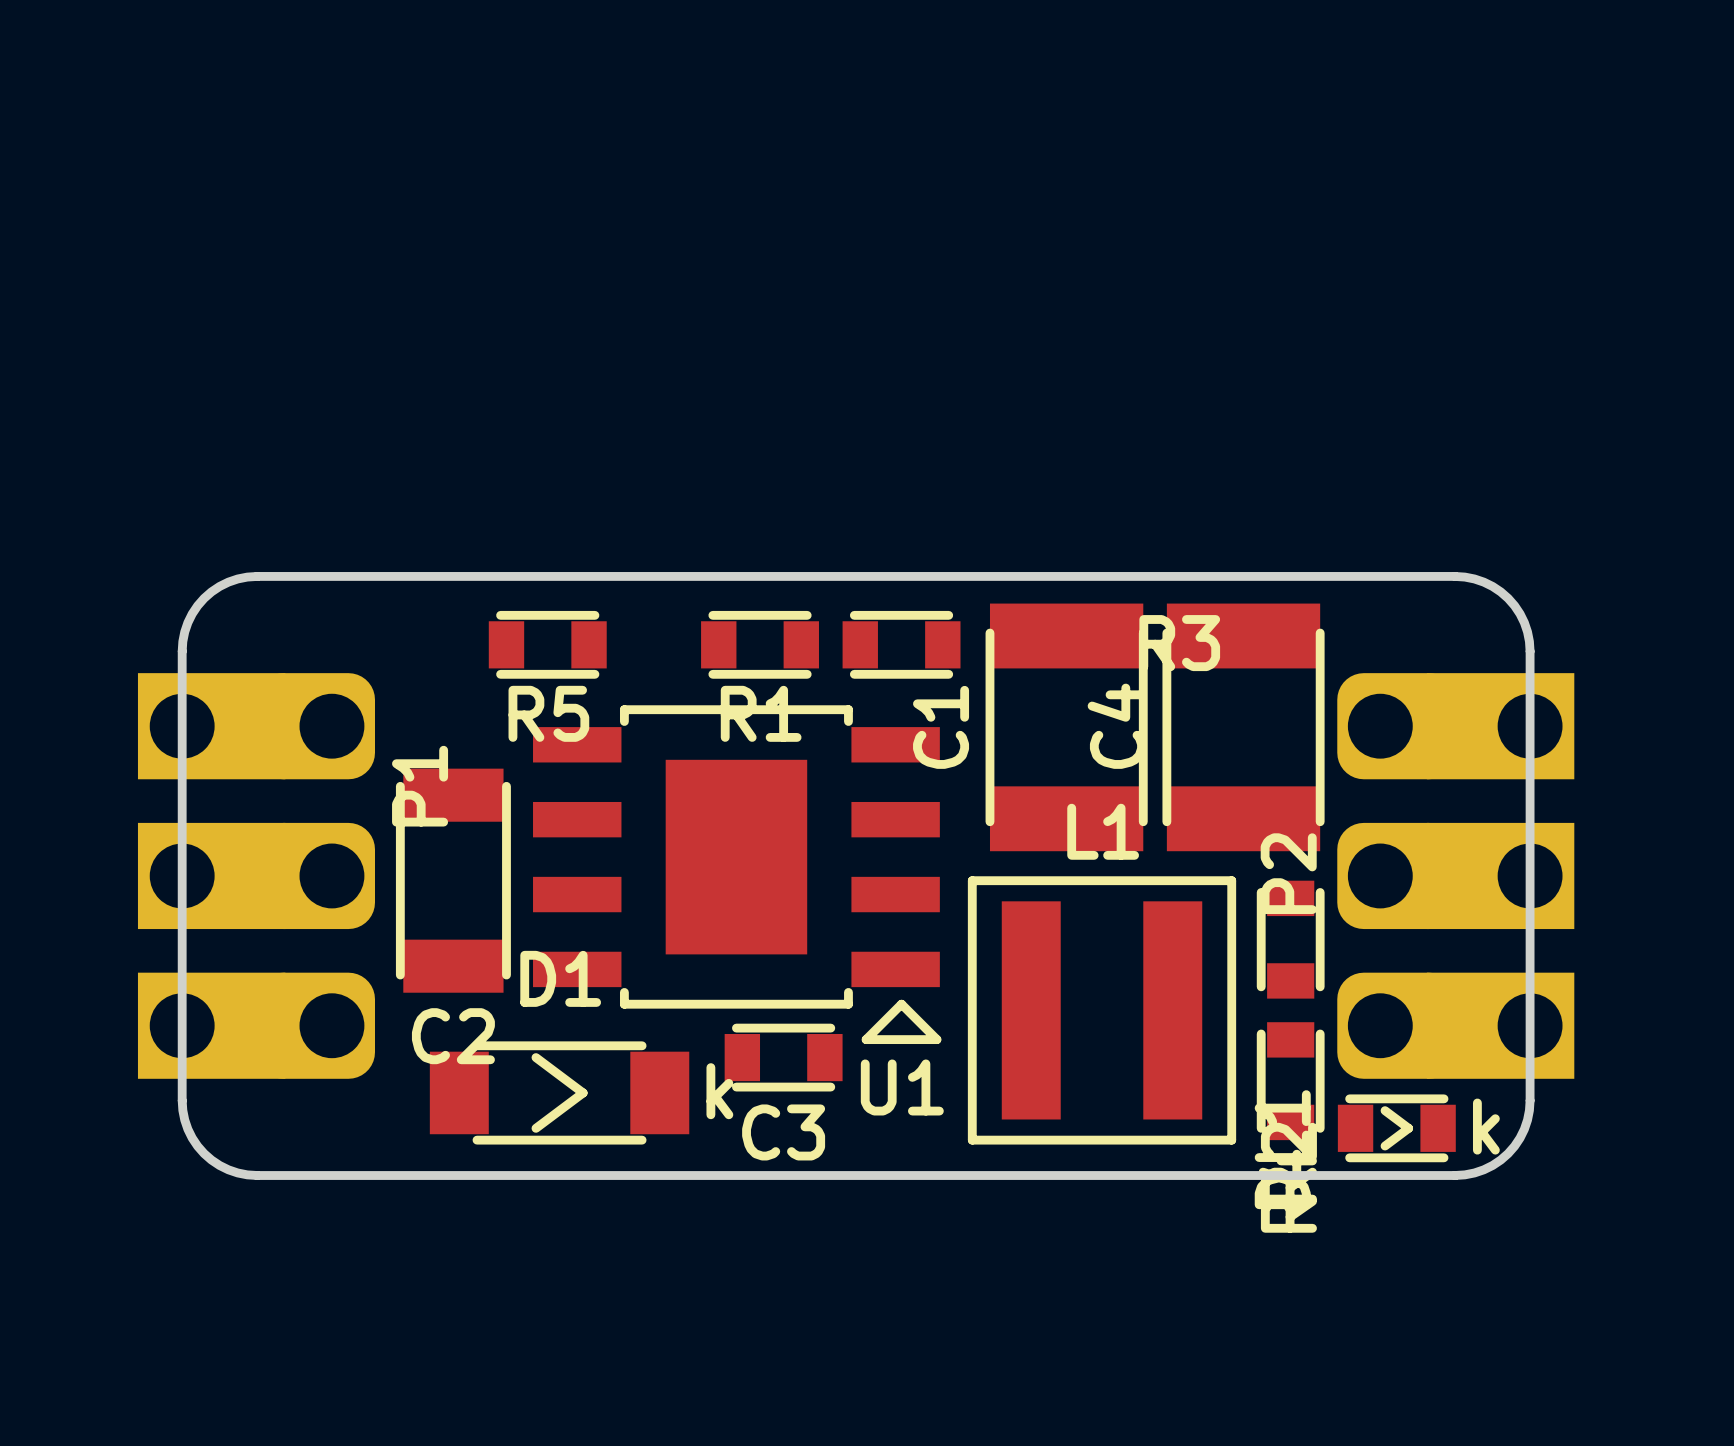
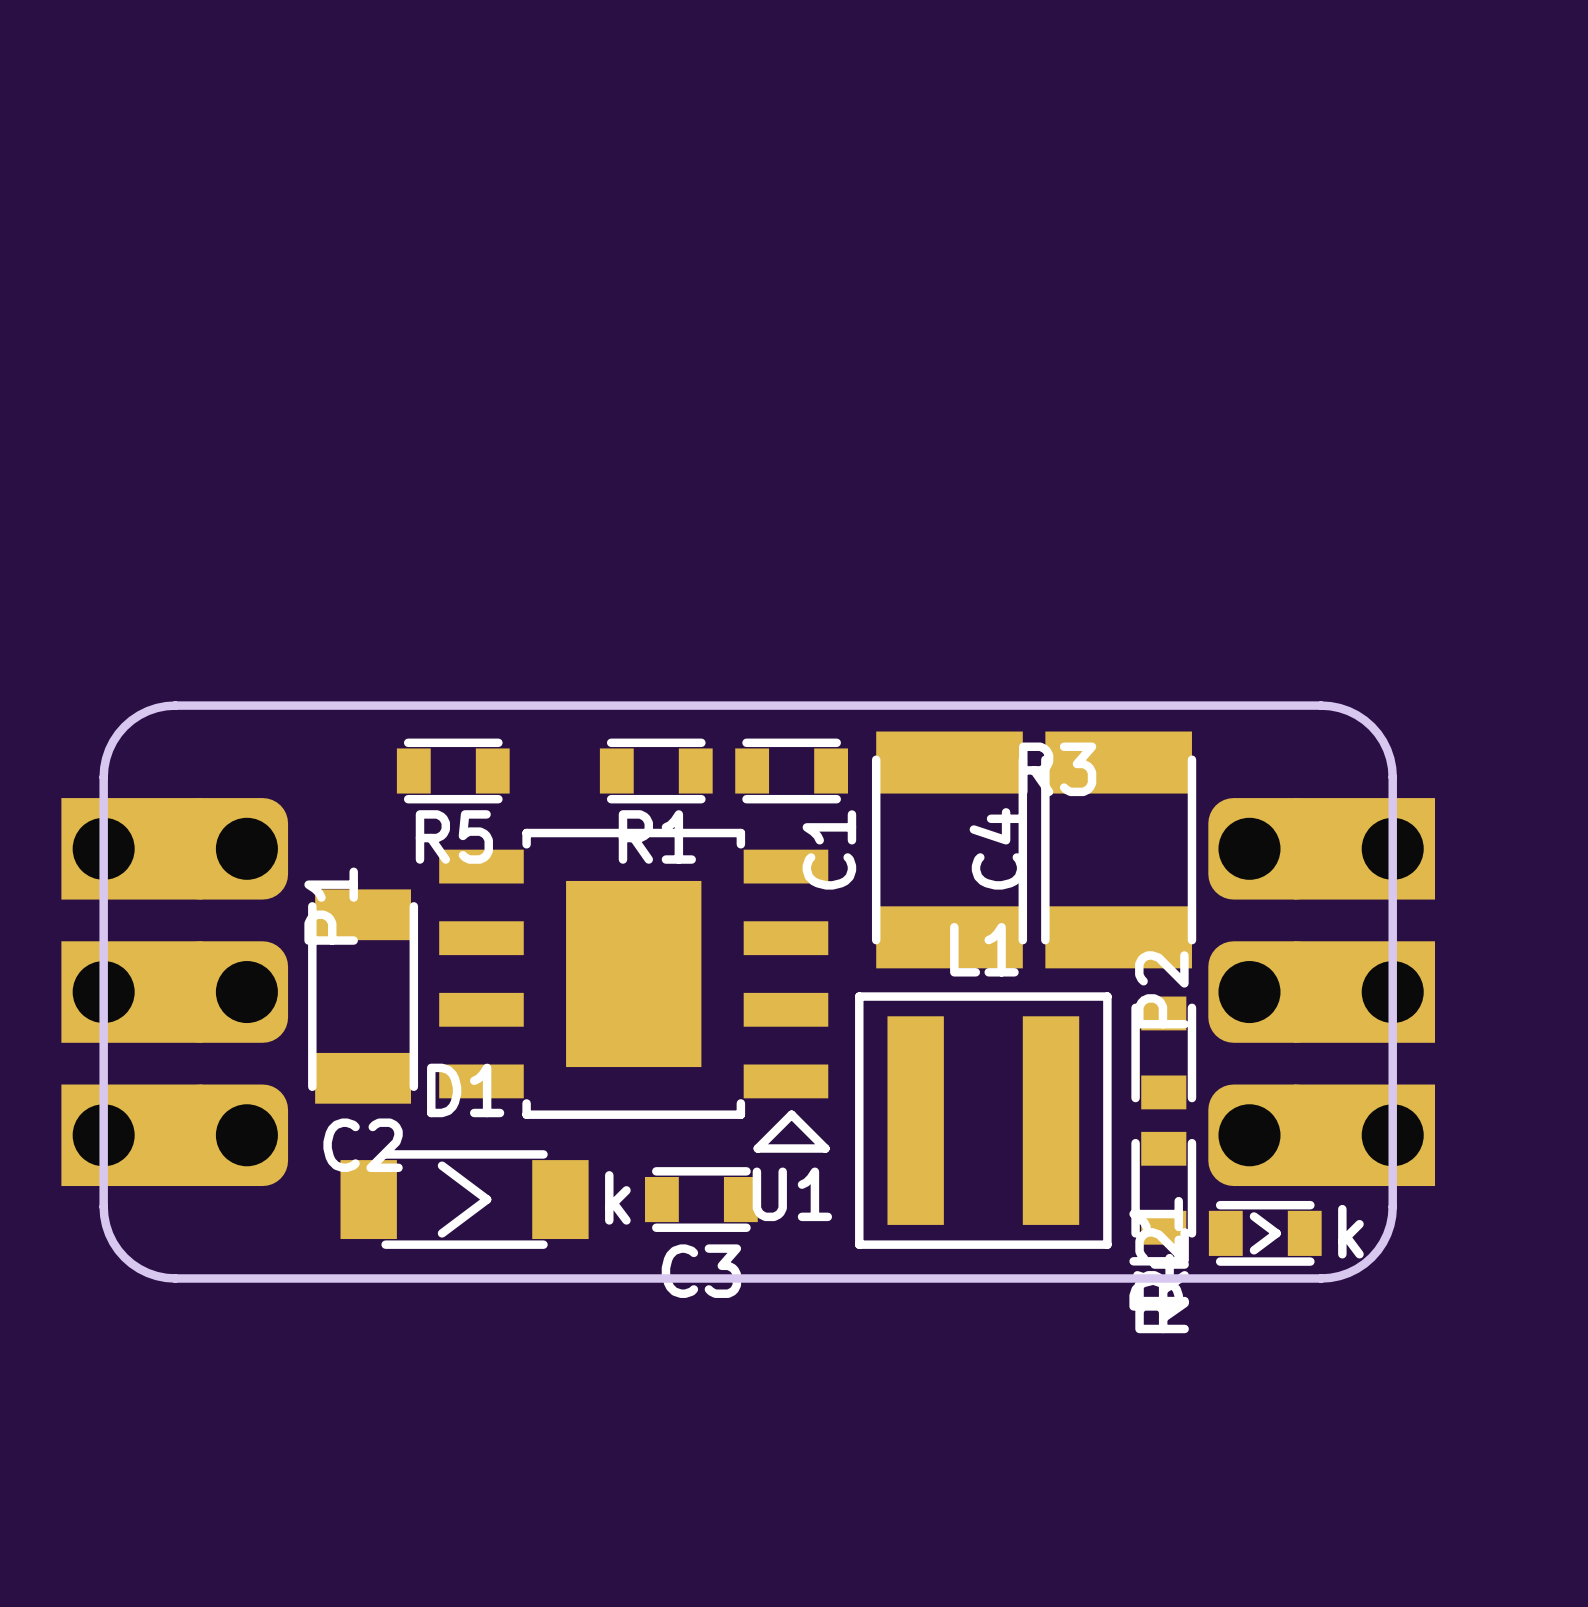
C3 position: (783, 1057) -> (701, 1199)

